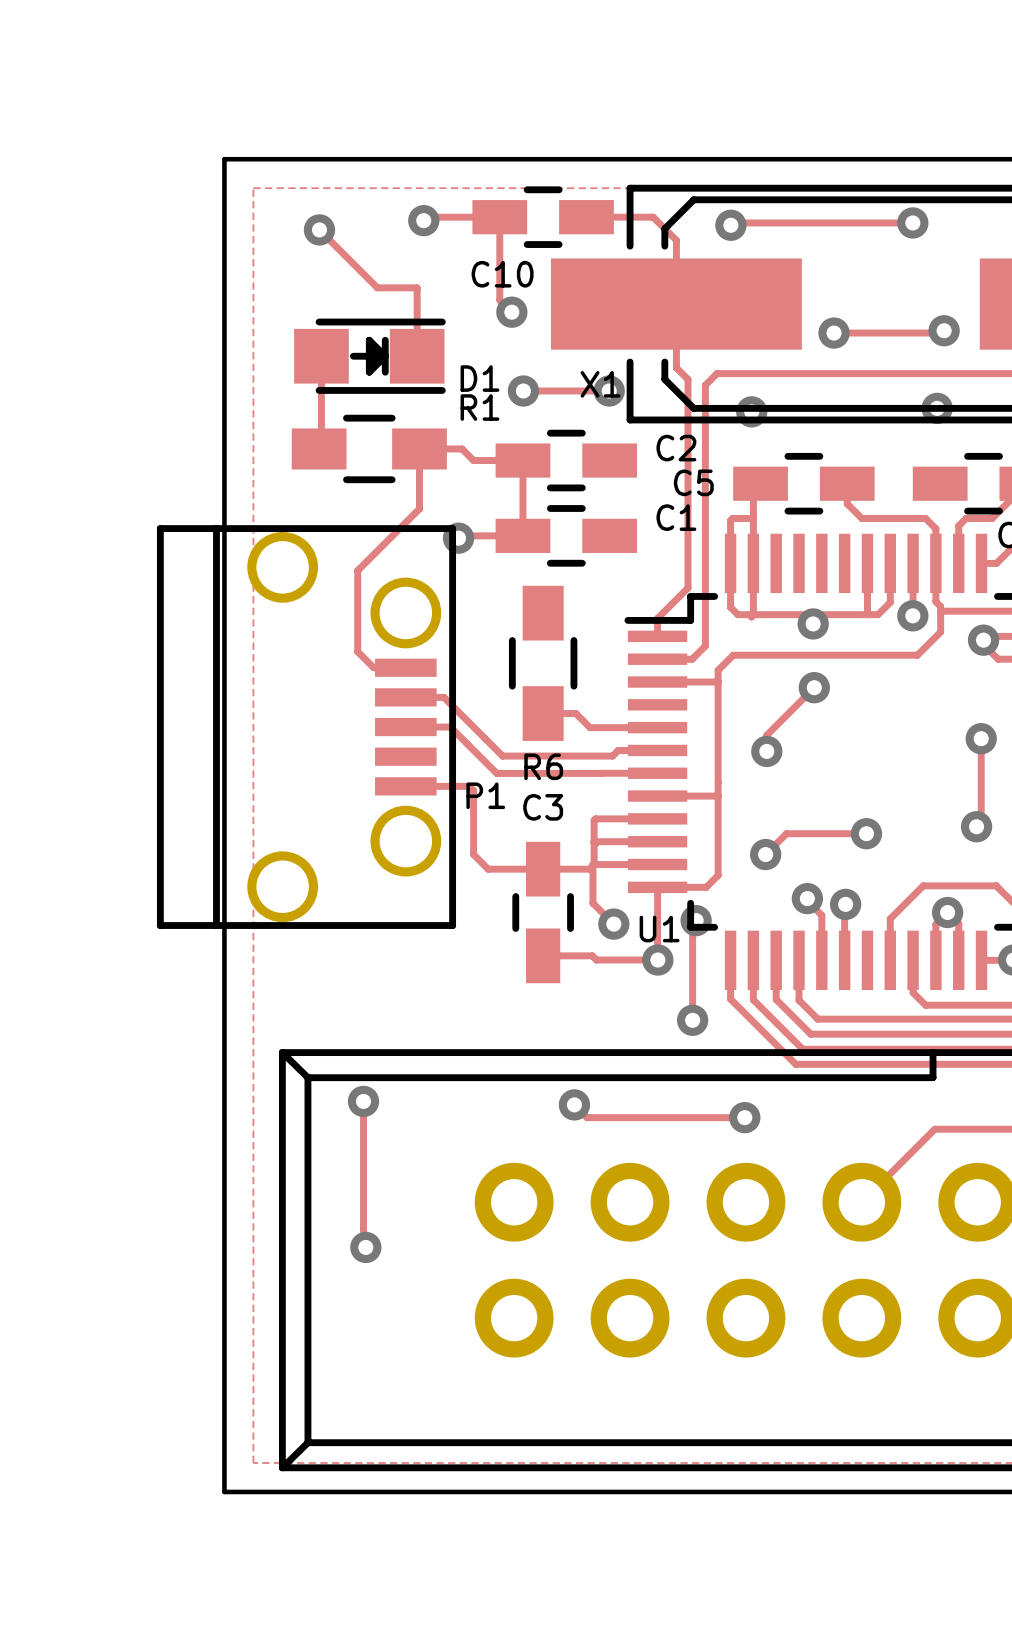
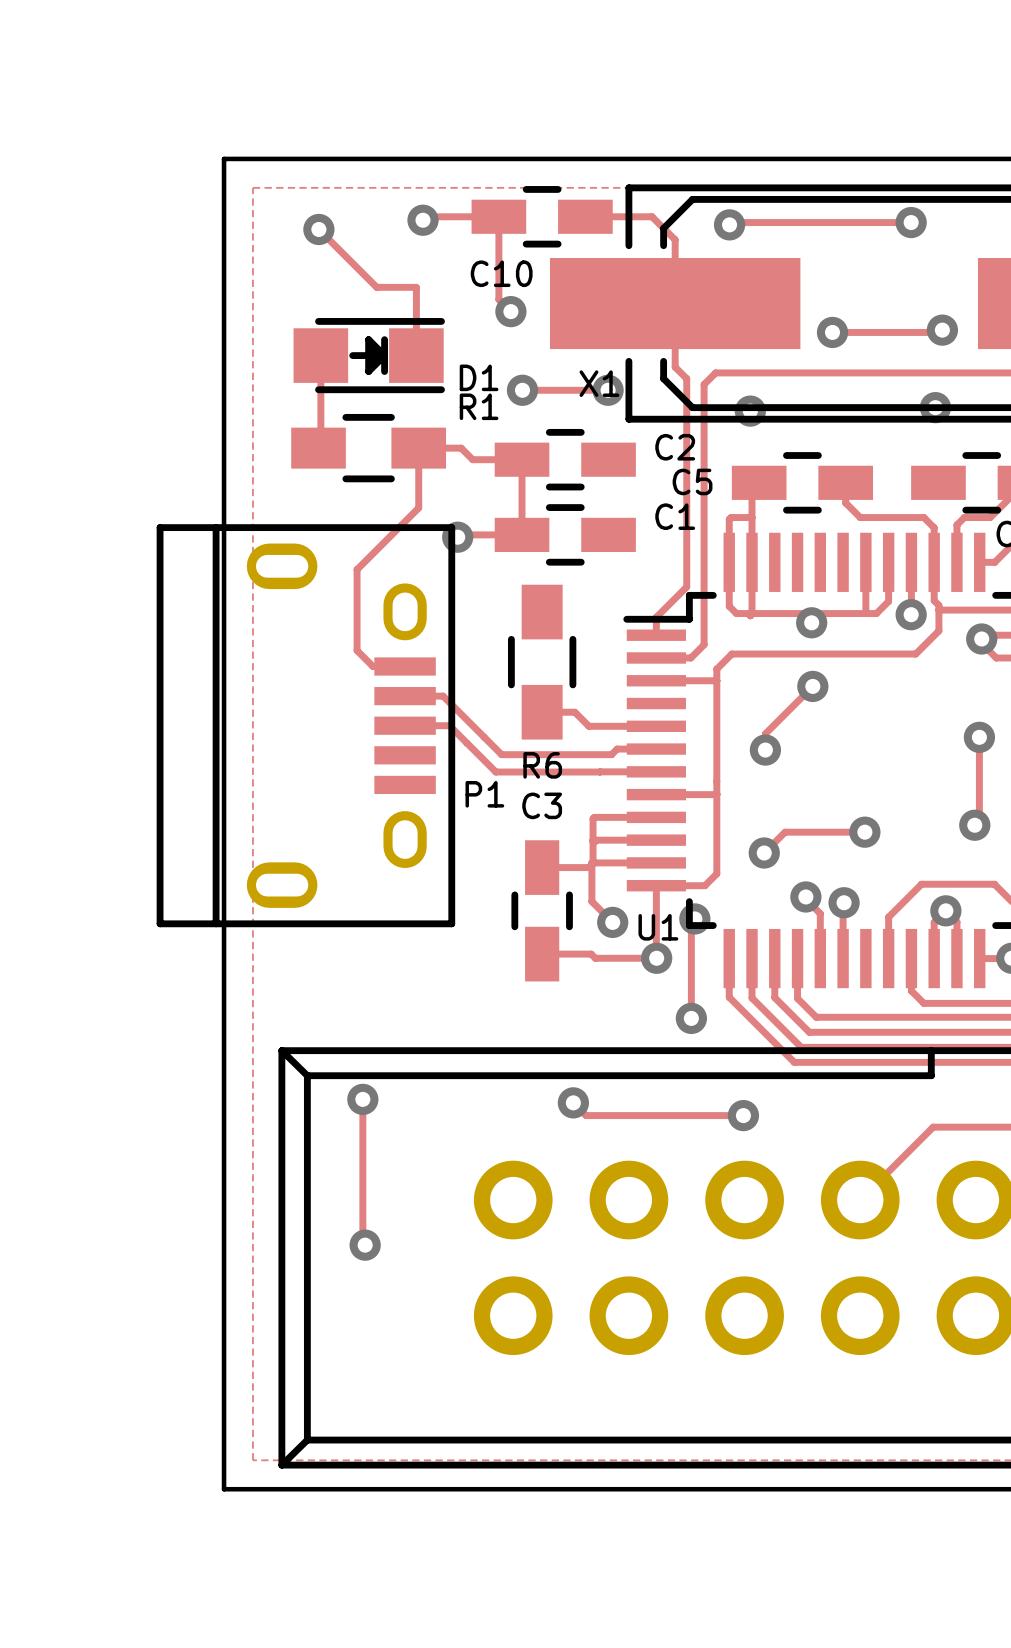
P1 footprint: [156, 525, 457, 929] -> [156, 524, 456, 928]
track: (405, 786) (469, 786) (473, 790) (473, 854) (488, 869) (543, 869) -> none

